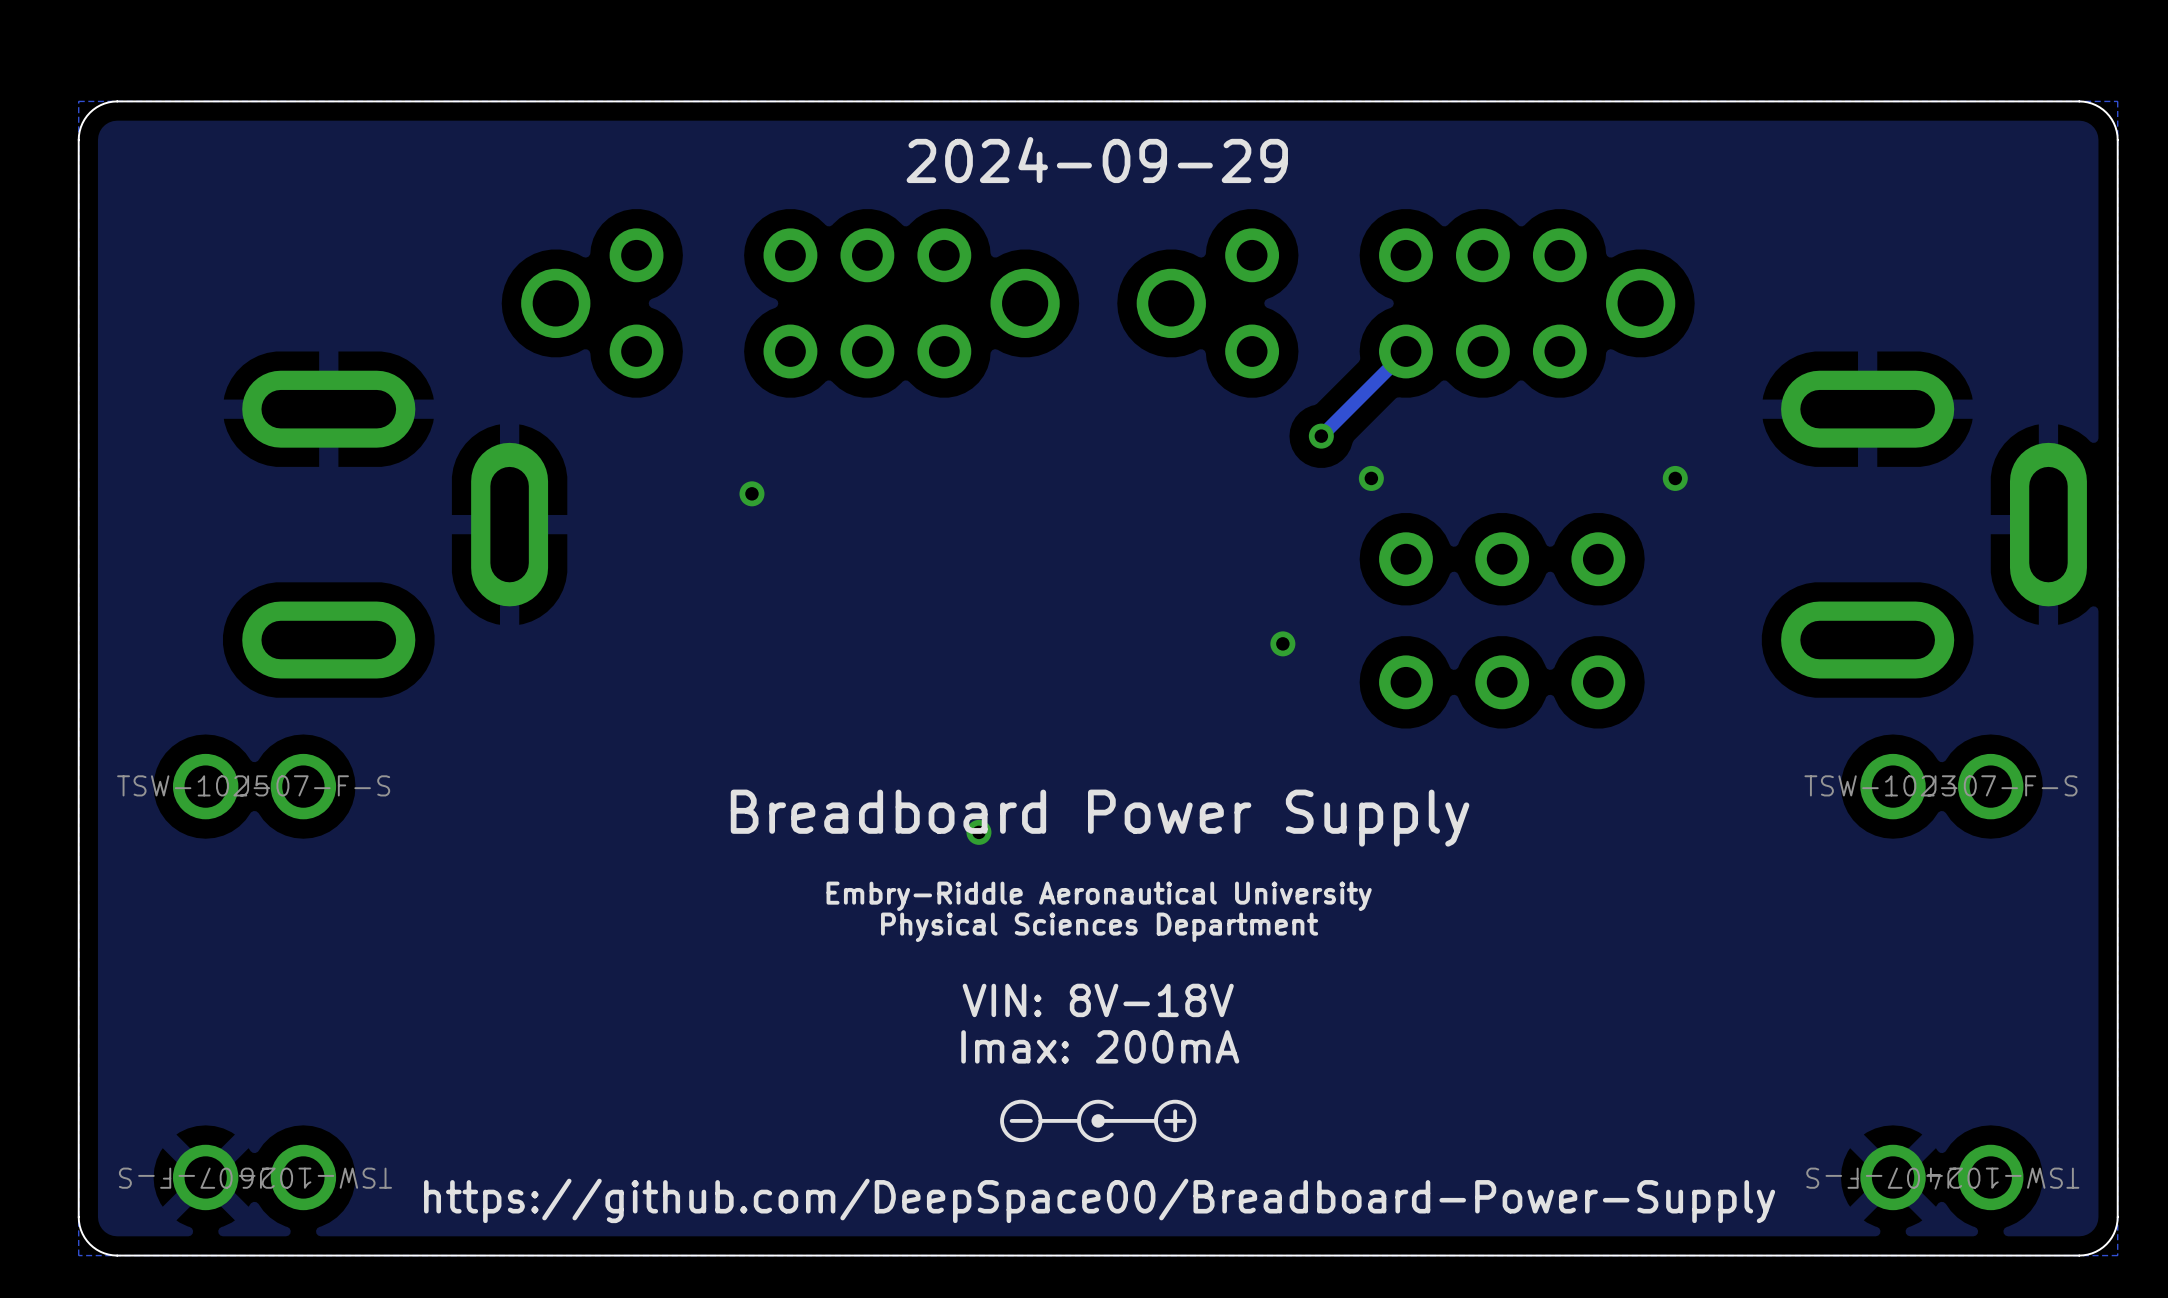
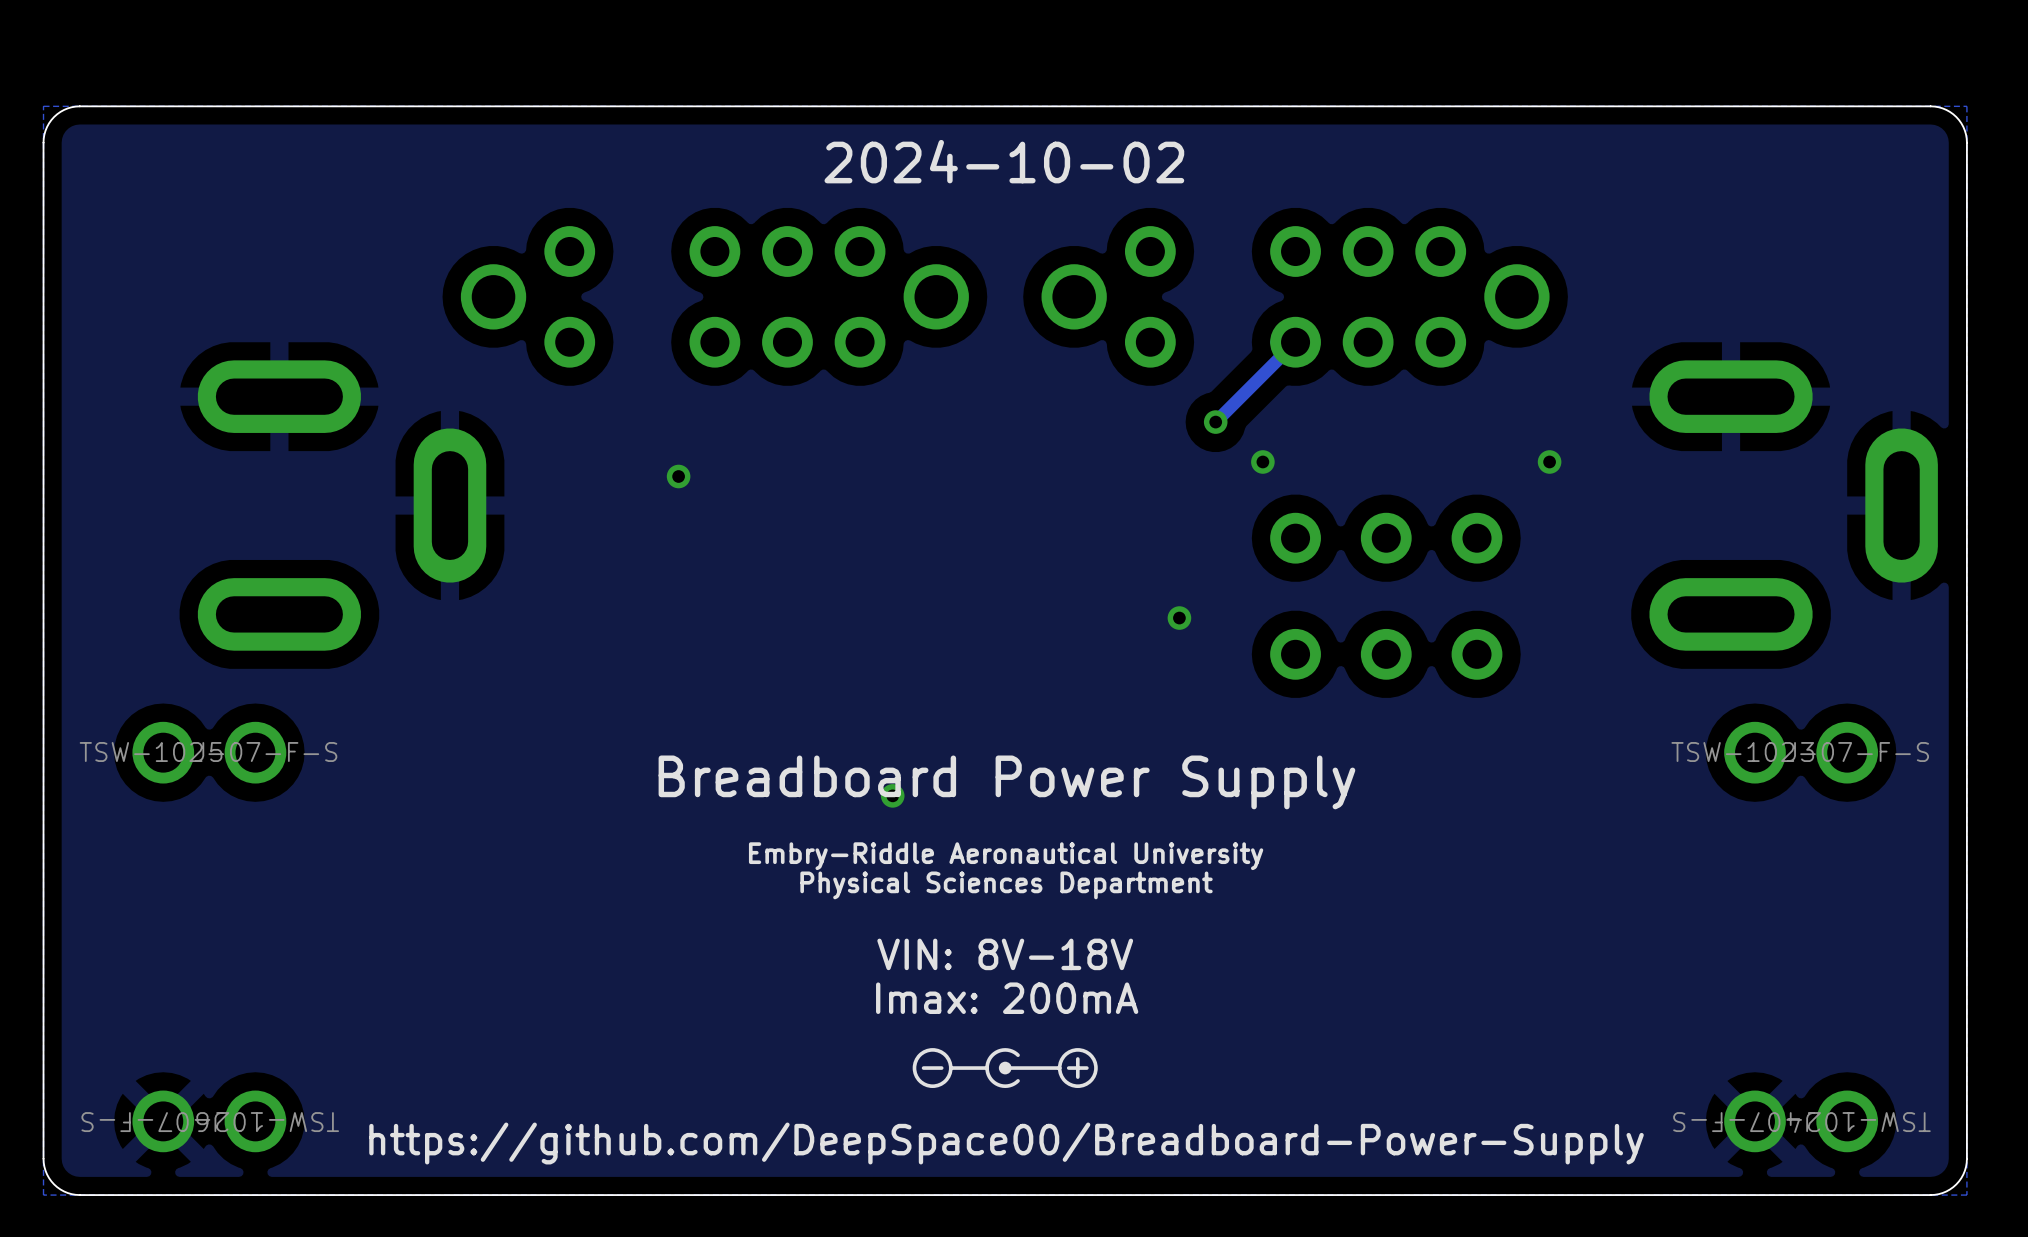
text: 2024-09-29 (1097, 160) -> 2024-10-02 (1004, 161)

